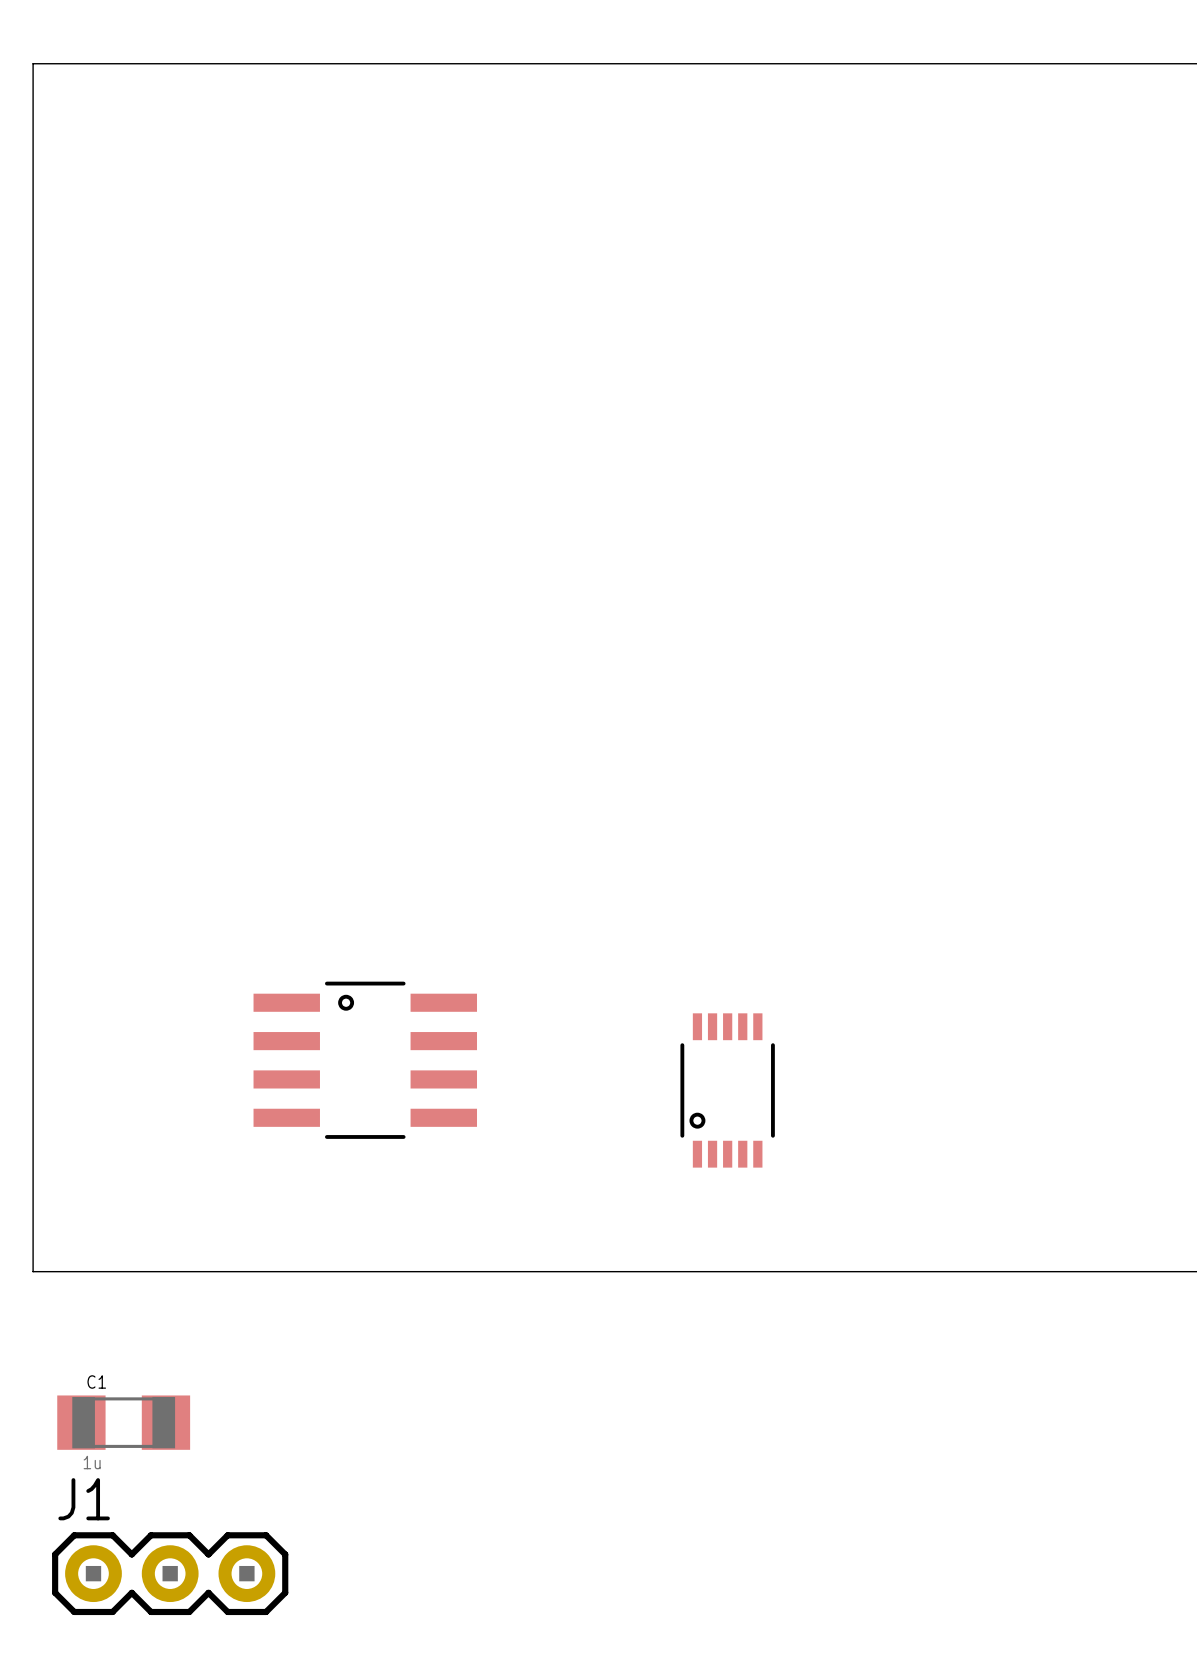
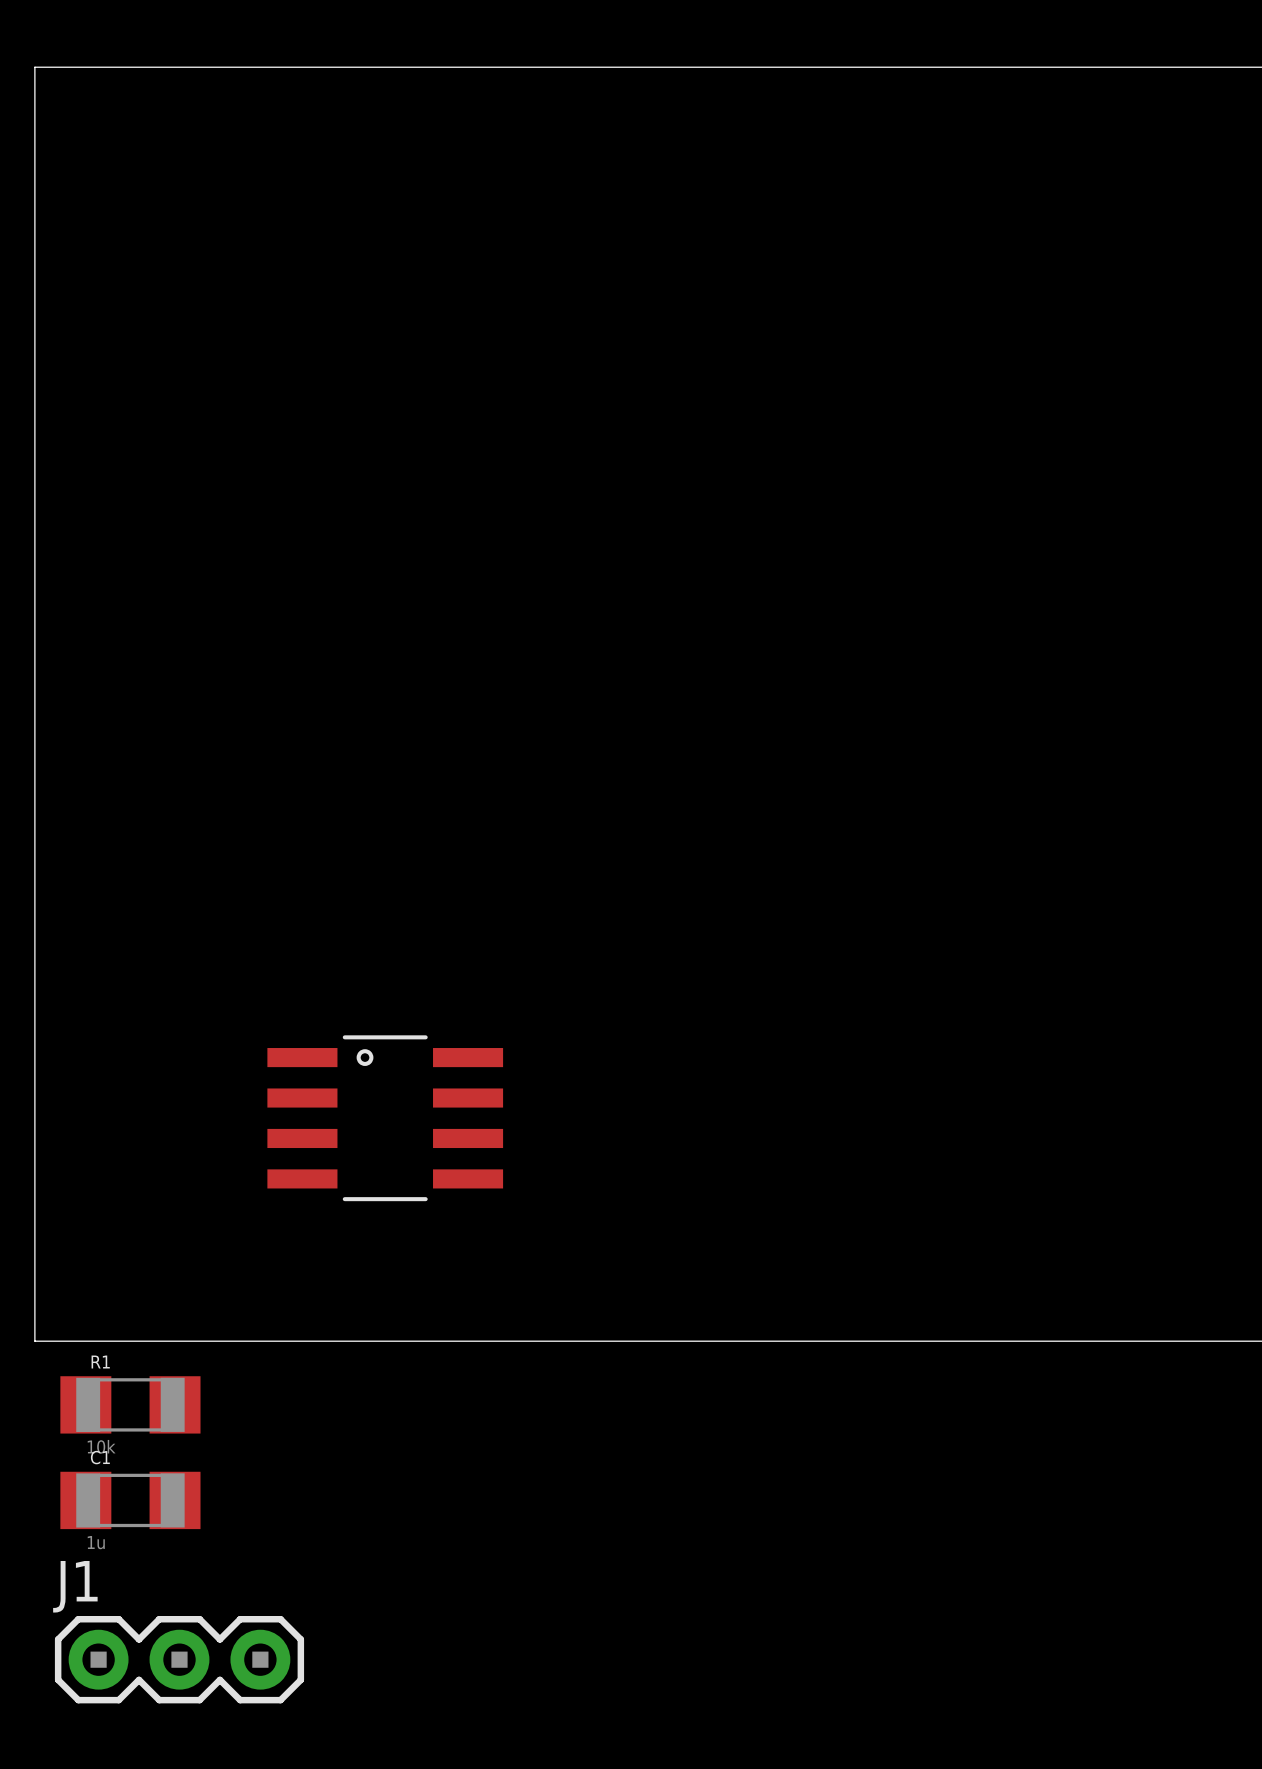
part: (727, 1090) -> none
R1: none -> 10k (130, 1404)

